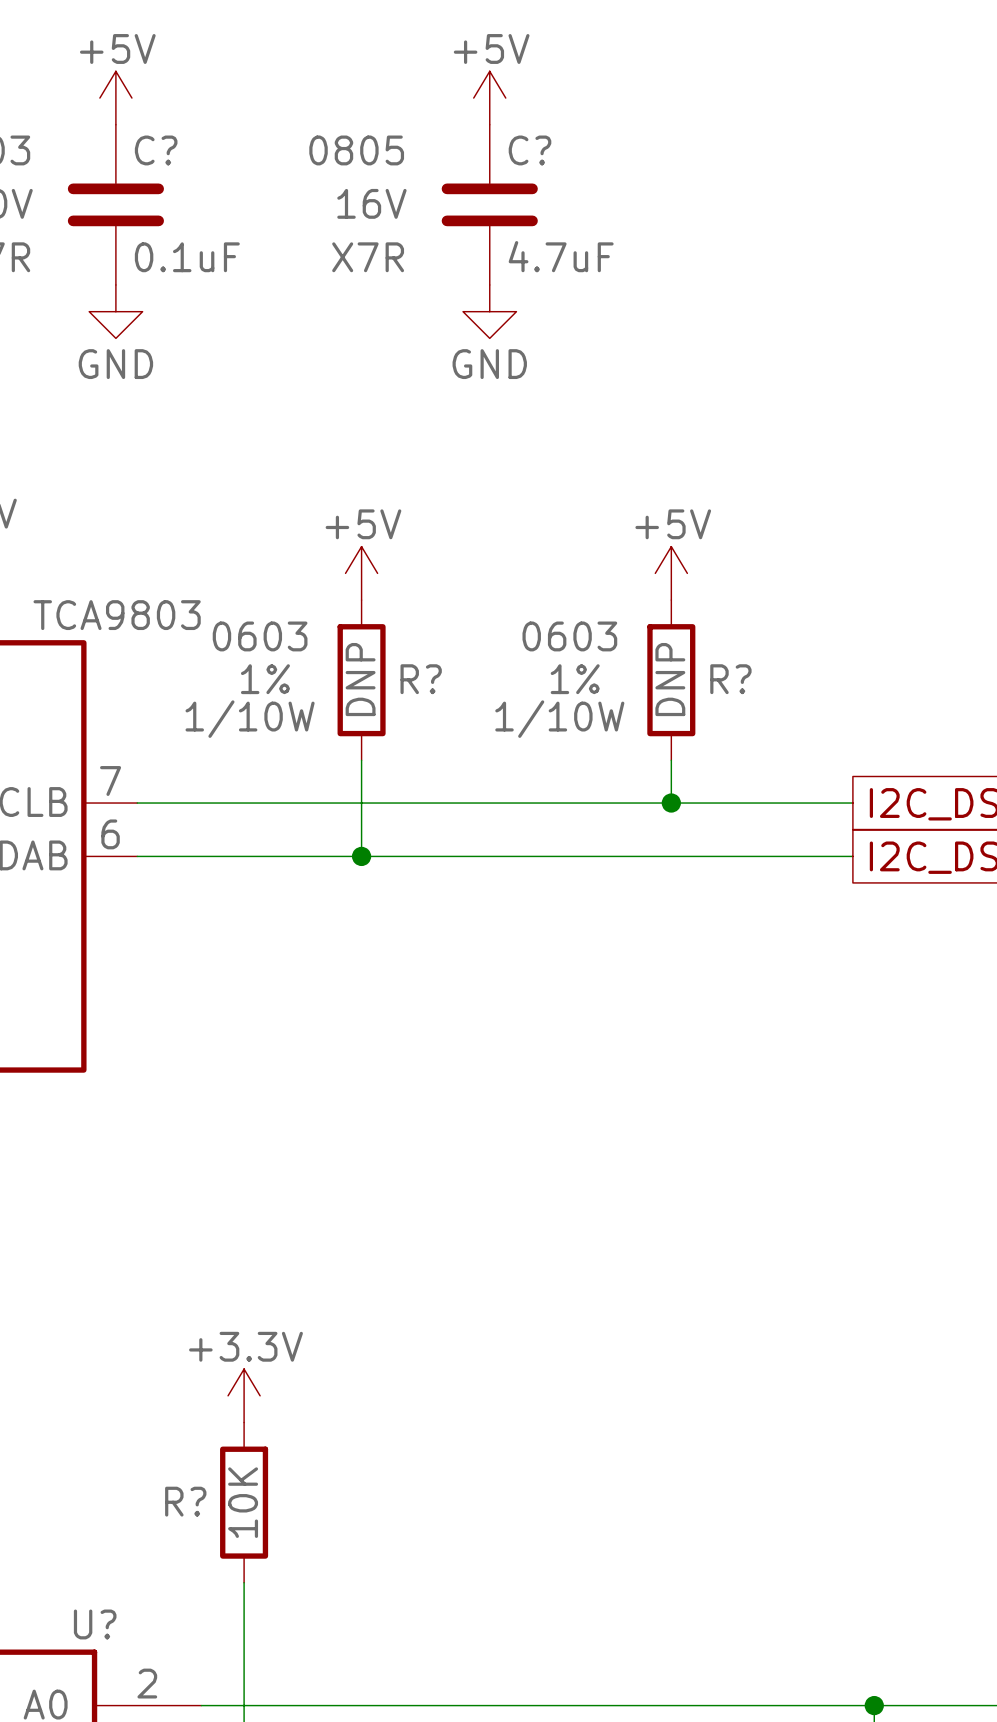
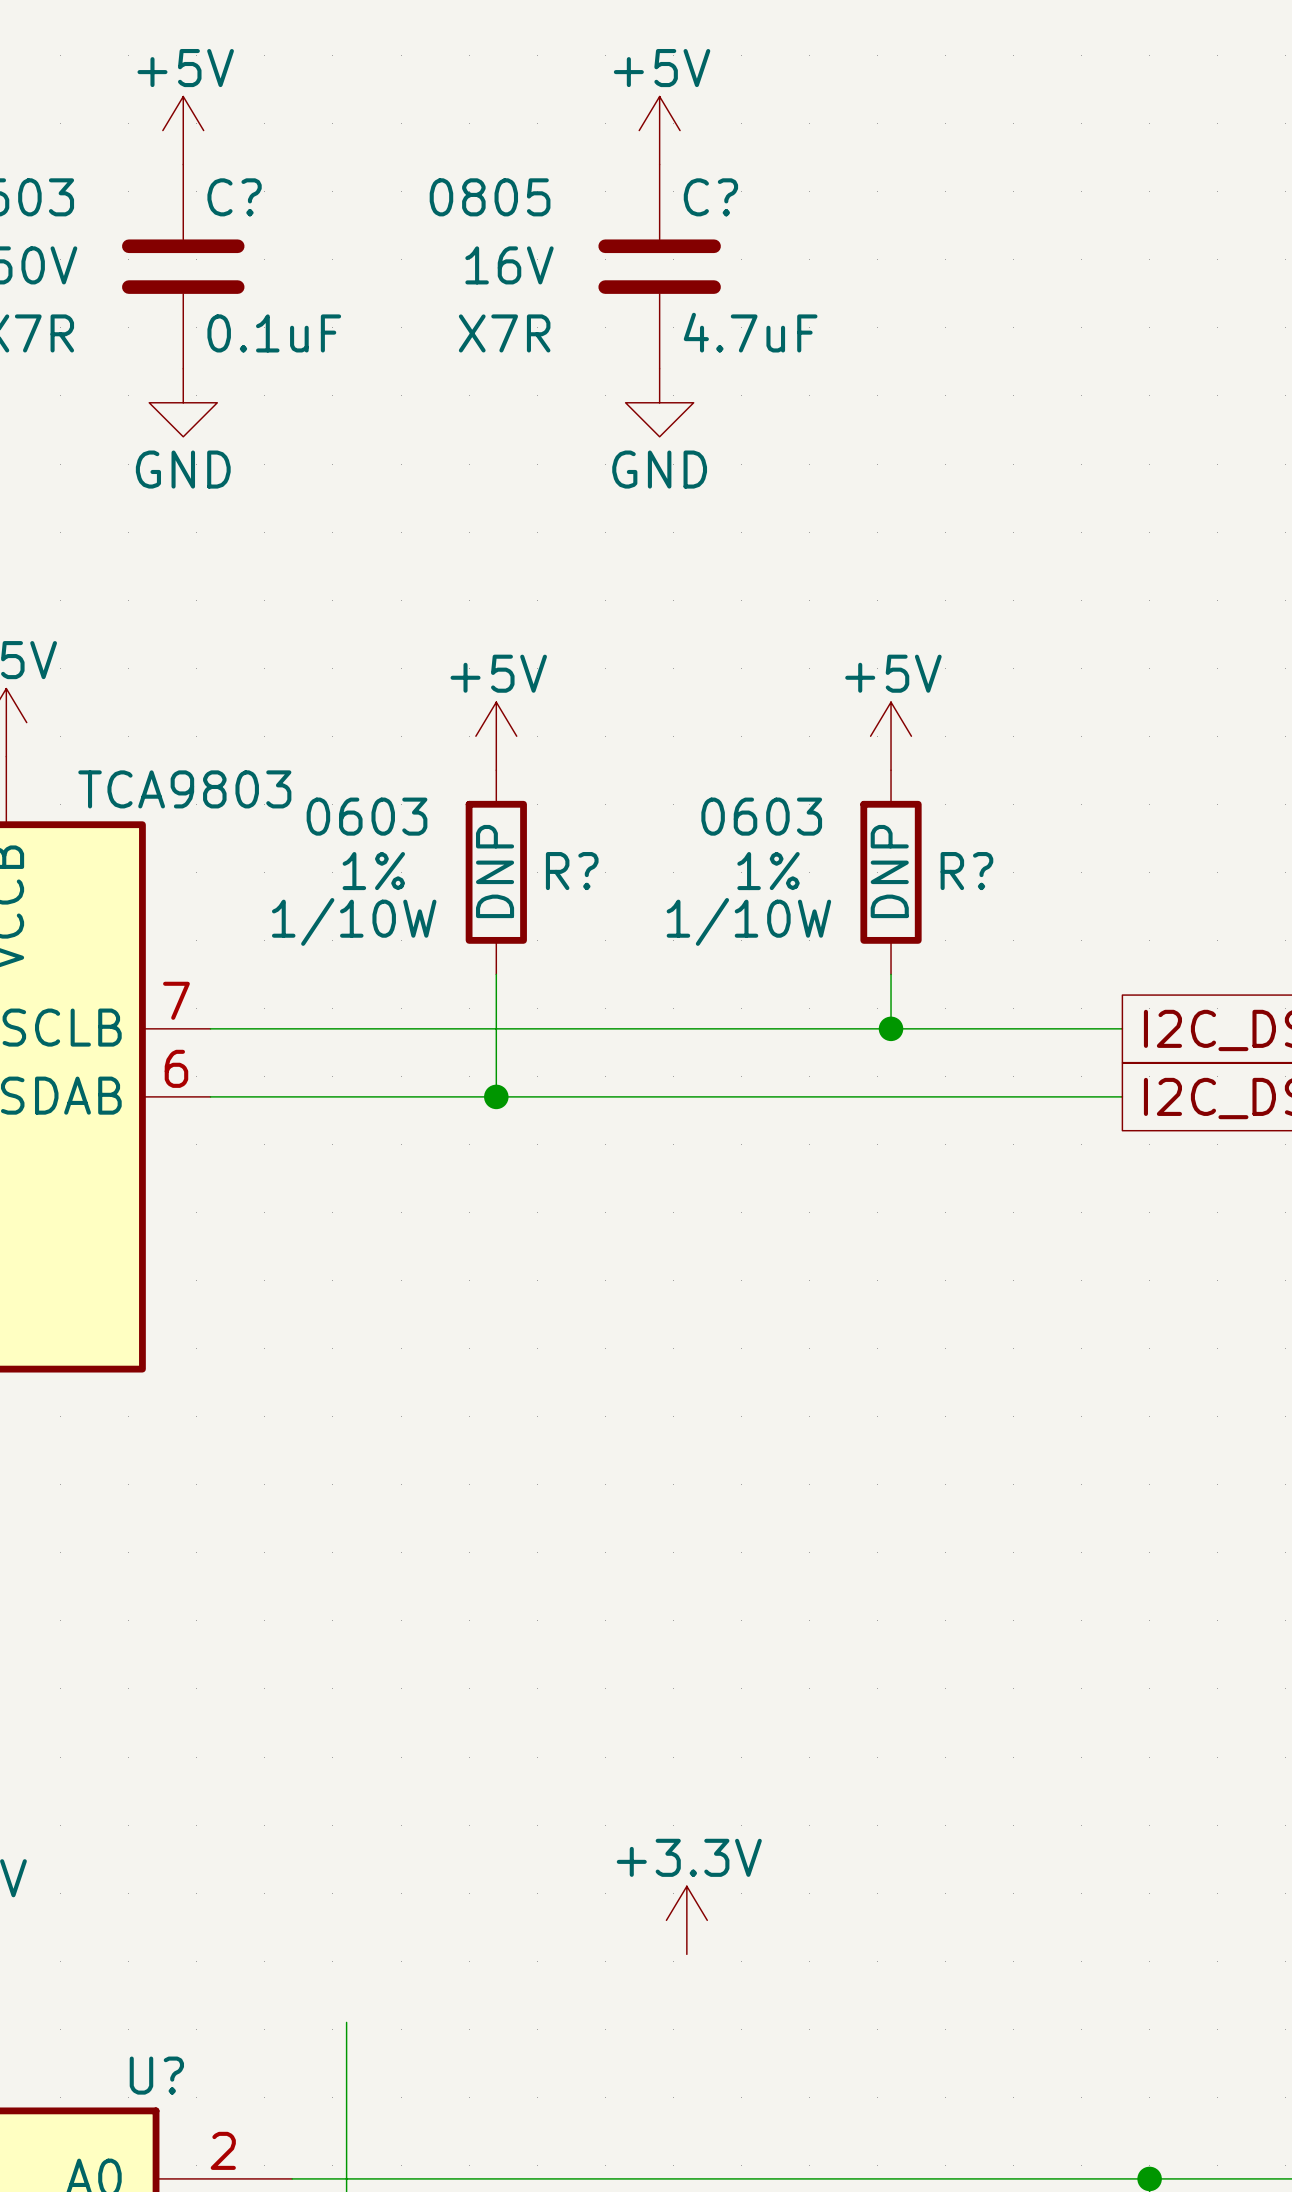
power symbol position: +3.3V (244, 1395) -> +3.3V (686, 1920)
R?: 10K (244, 1502) -> none

